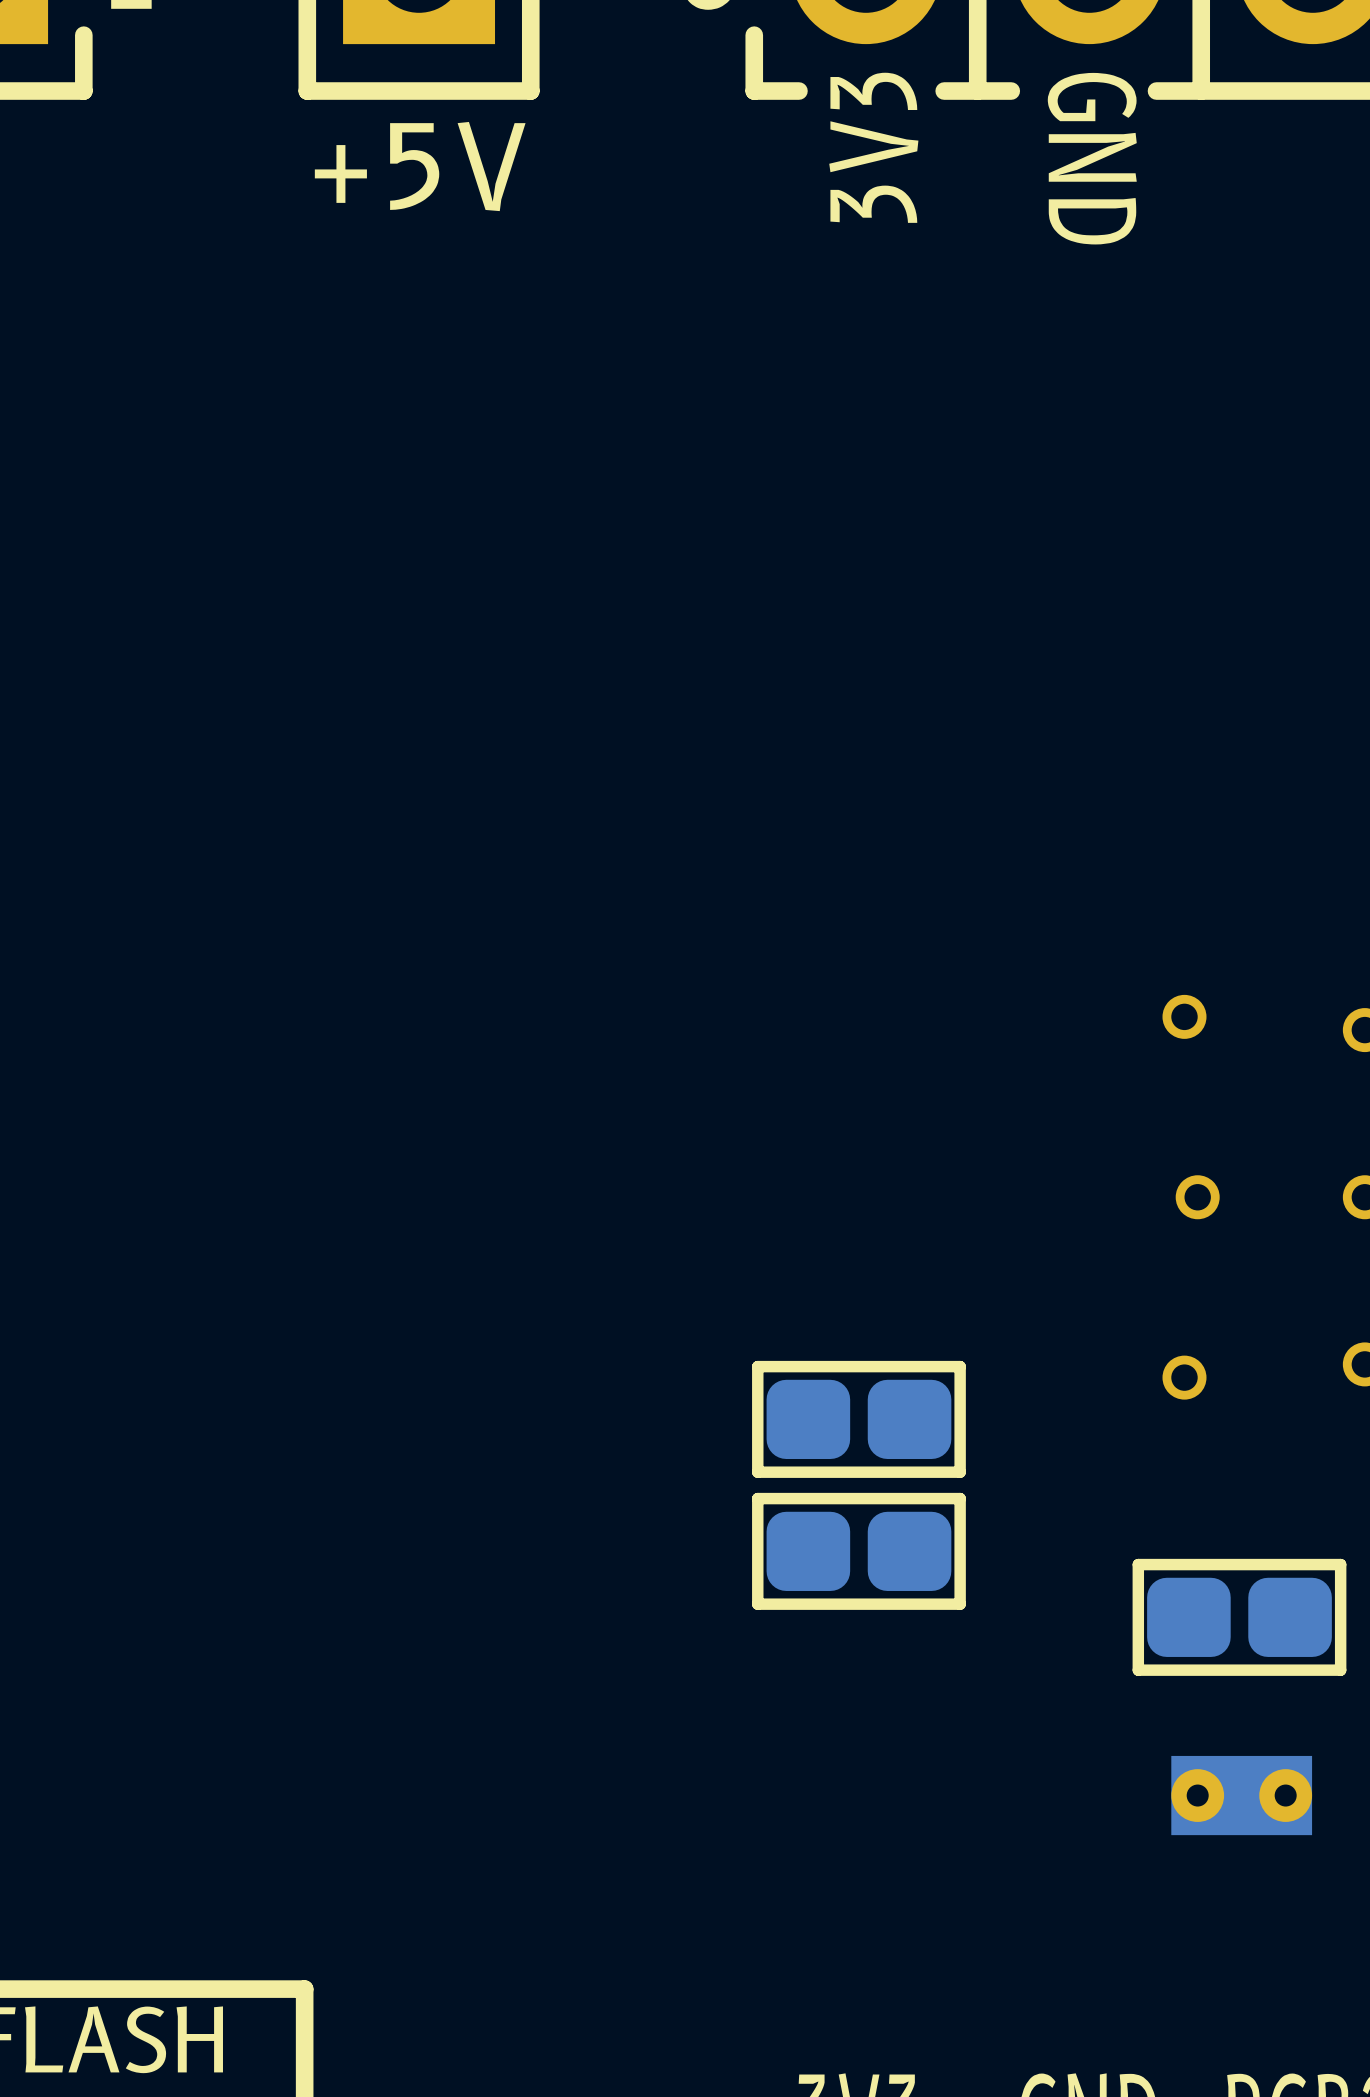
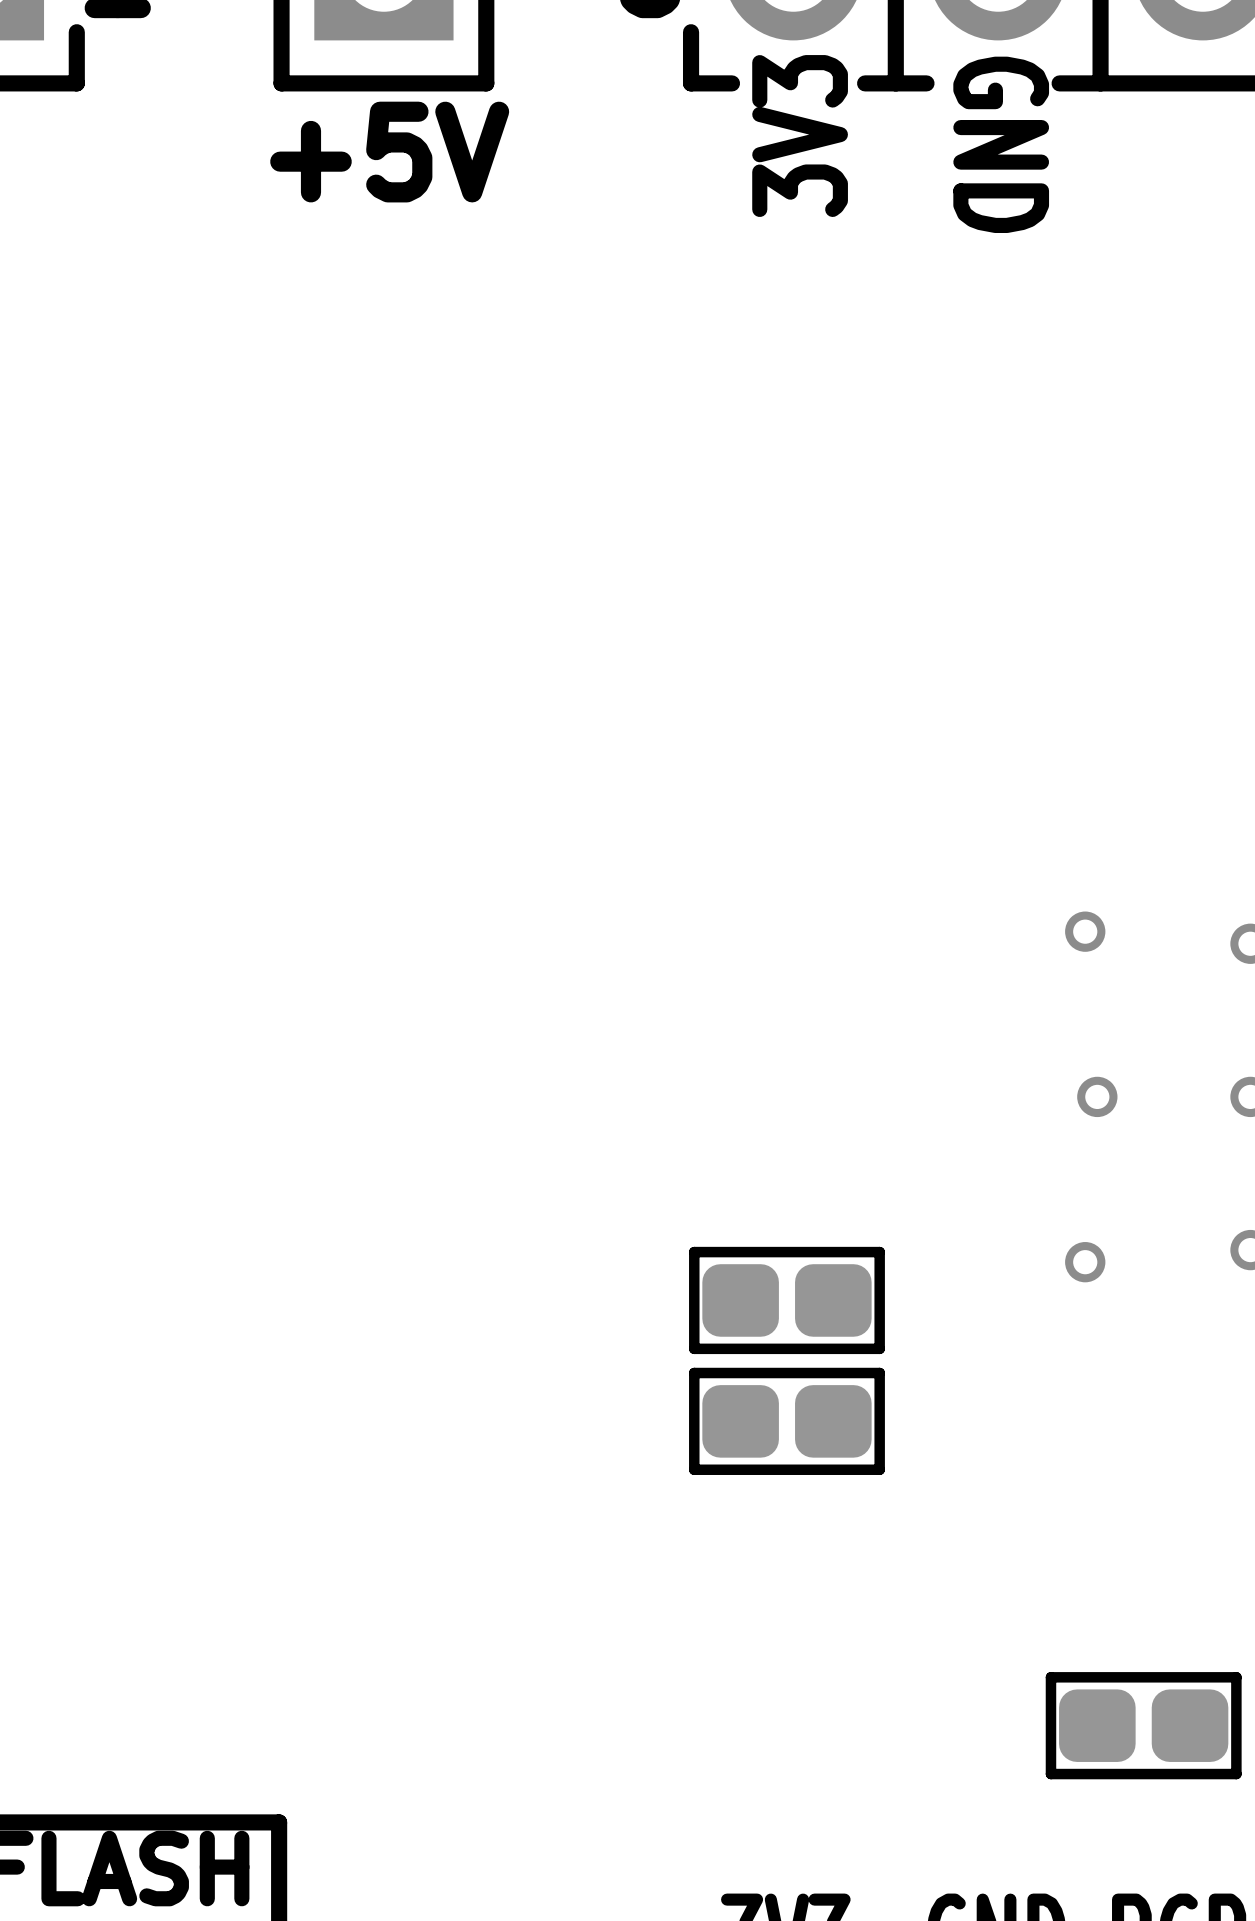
part: (1239, 1617) -> none
part: (1241, 1795) -> none
part: none -> (1143, 1725)

